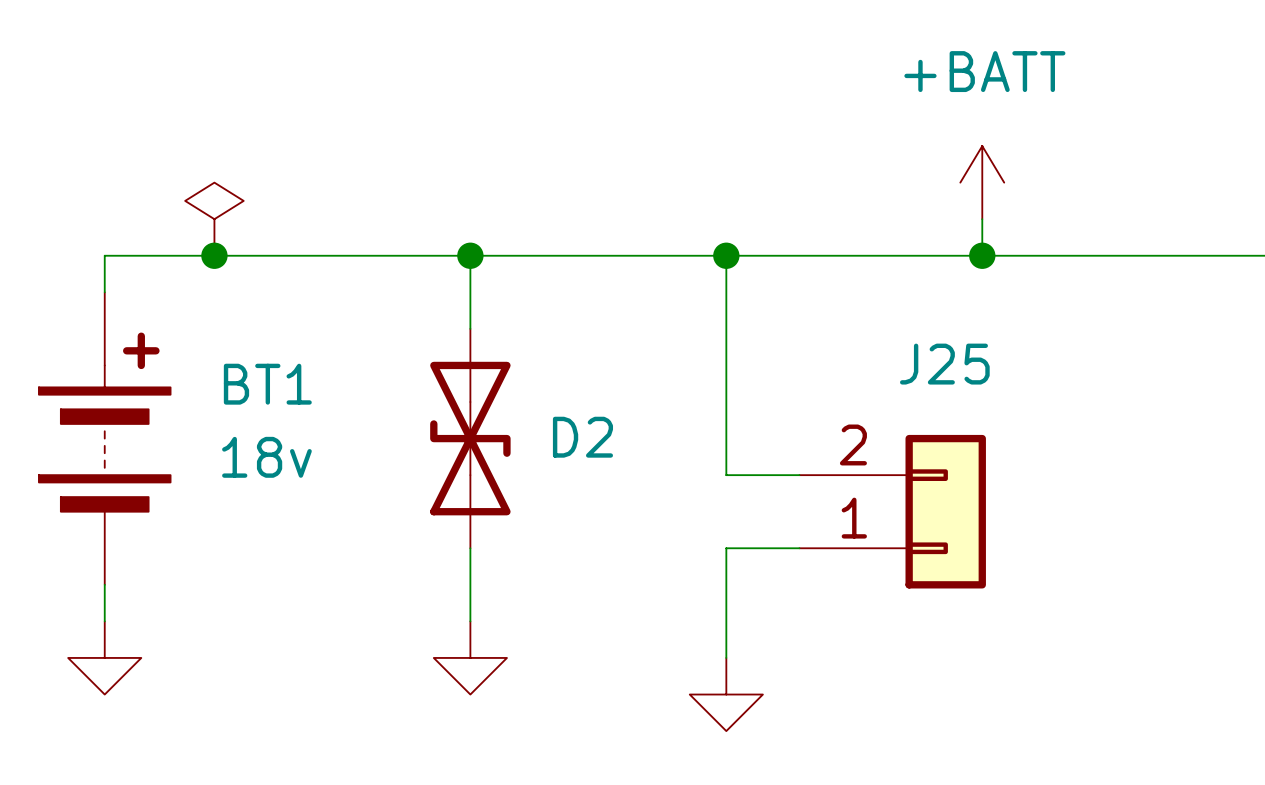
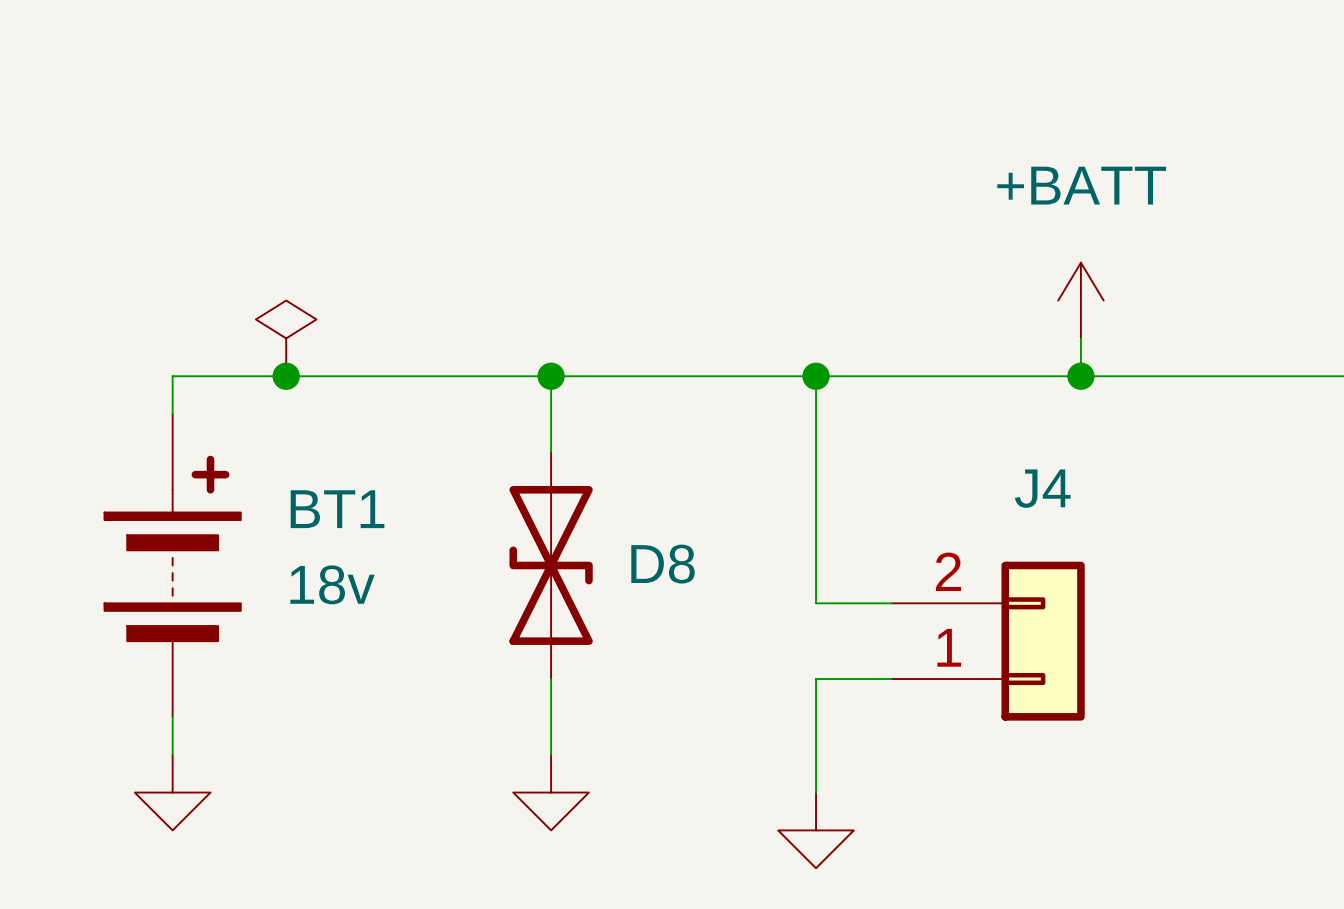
J25 name: J25 (944, 364) -> J4 (1042, 488)
D2 name: D2 (582, 437) -> D8 (663, 564)

